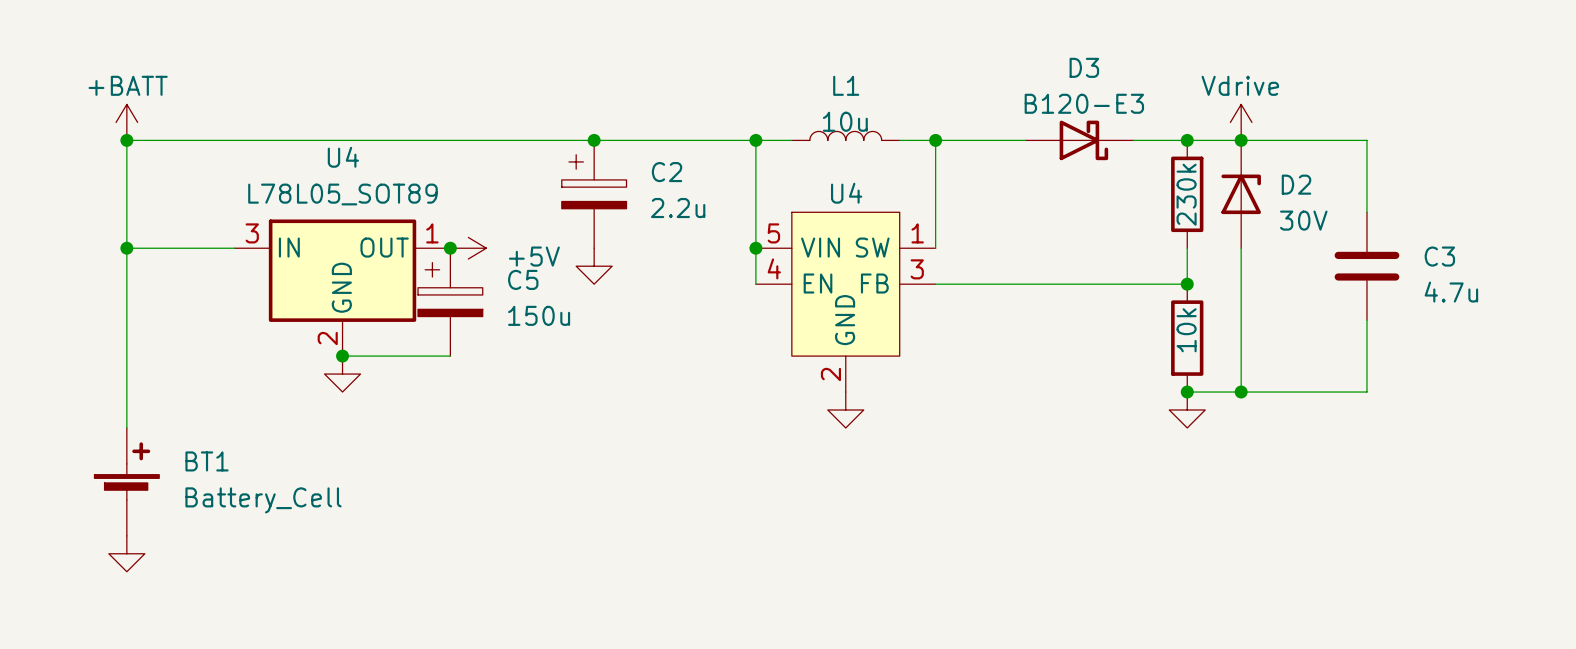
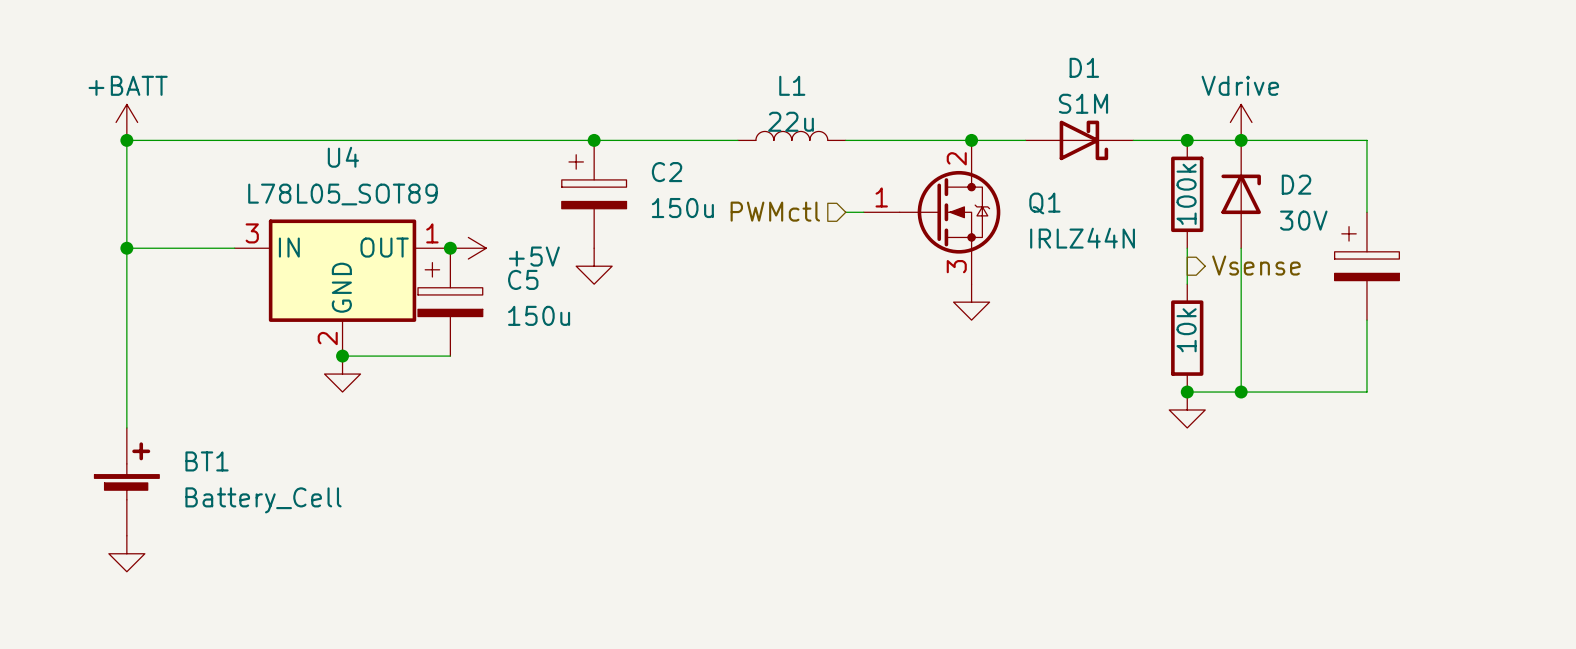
D3 name: D3 (1084, 67) -> D1 (1084, 67)
D3 value: B120-E3 (1084, 103) -> S1M (1083, 103)
L1 value: 10u (845, 121) -> 22u (791, 121)
L1 position: (845, 135) -> (791, 135)
wire: (737, 140) (791, 140) -> (845, 140) (899, 140)
wire: (755, 140) (755, 284) -> none
junction: (755, 140) -> none
wire: (935, 140) (935, 248) -> none
junction position: (935, 140) -> (971, 140)
part value: 230k (1186, 194) -> 100k (1186, 194)
C2 value: 2.2u (678, 208) -> 150u (682, 208)
hierarchical label: none -> PWMctl (775, 211)
Q1: none -> IRLZ44N (932, 212)
junction: (755, 248) -> none
hierarchical label: none -> Vsense (1256, 265)
C3: 4.7u (1366, 266) -> none
part: none -> (1366, 266)
wire: (935, 284) (1187, 284) -> none
junction: (1187, 284) -> none
U4: (845, 302) -> none
power symbol position: (845, 409) -> (971, 302)

